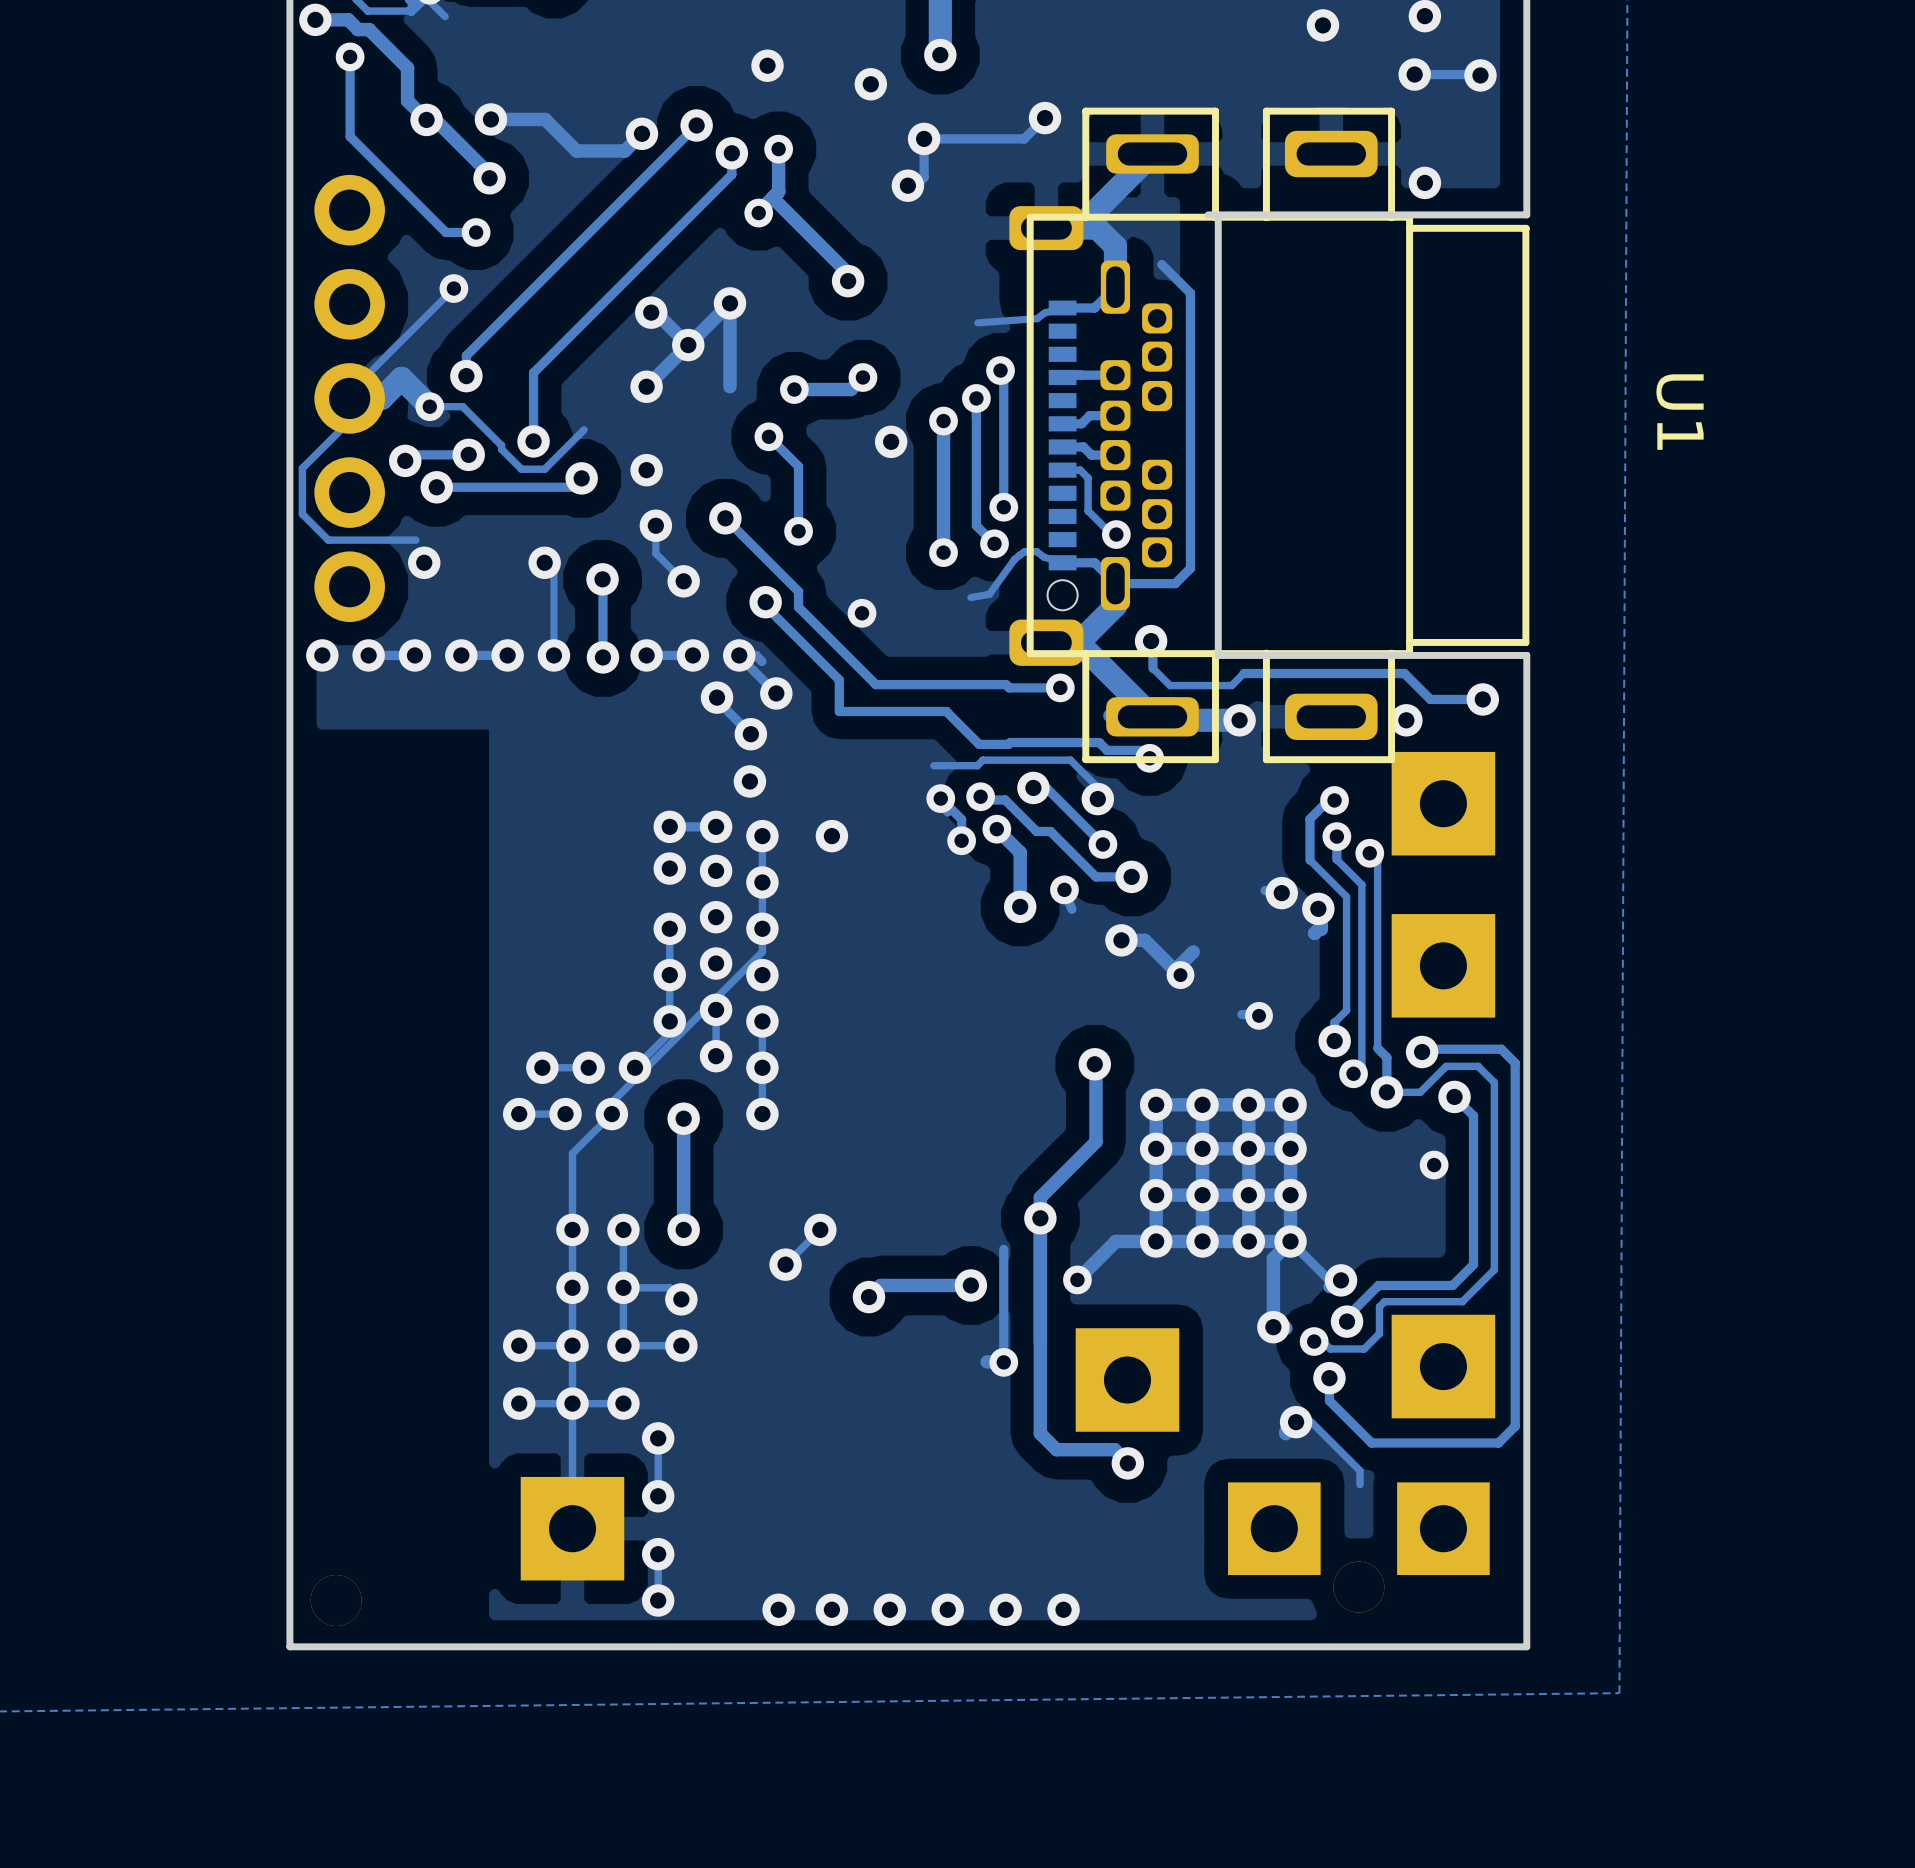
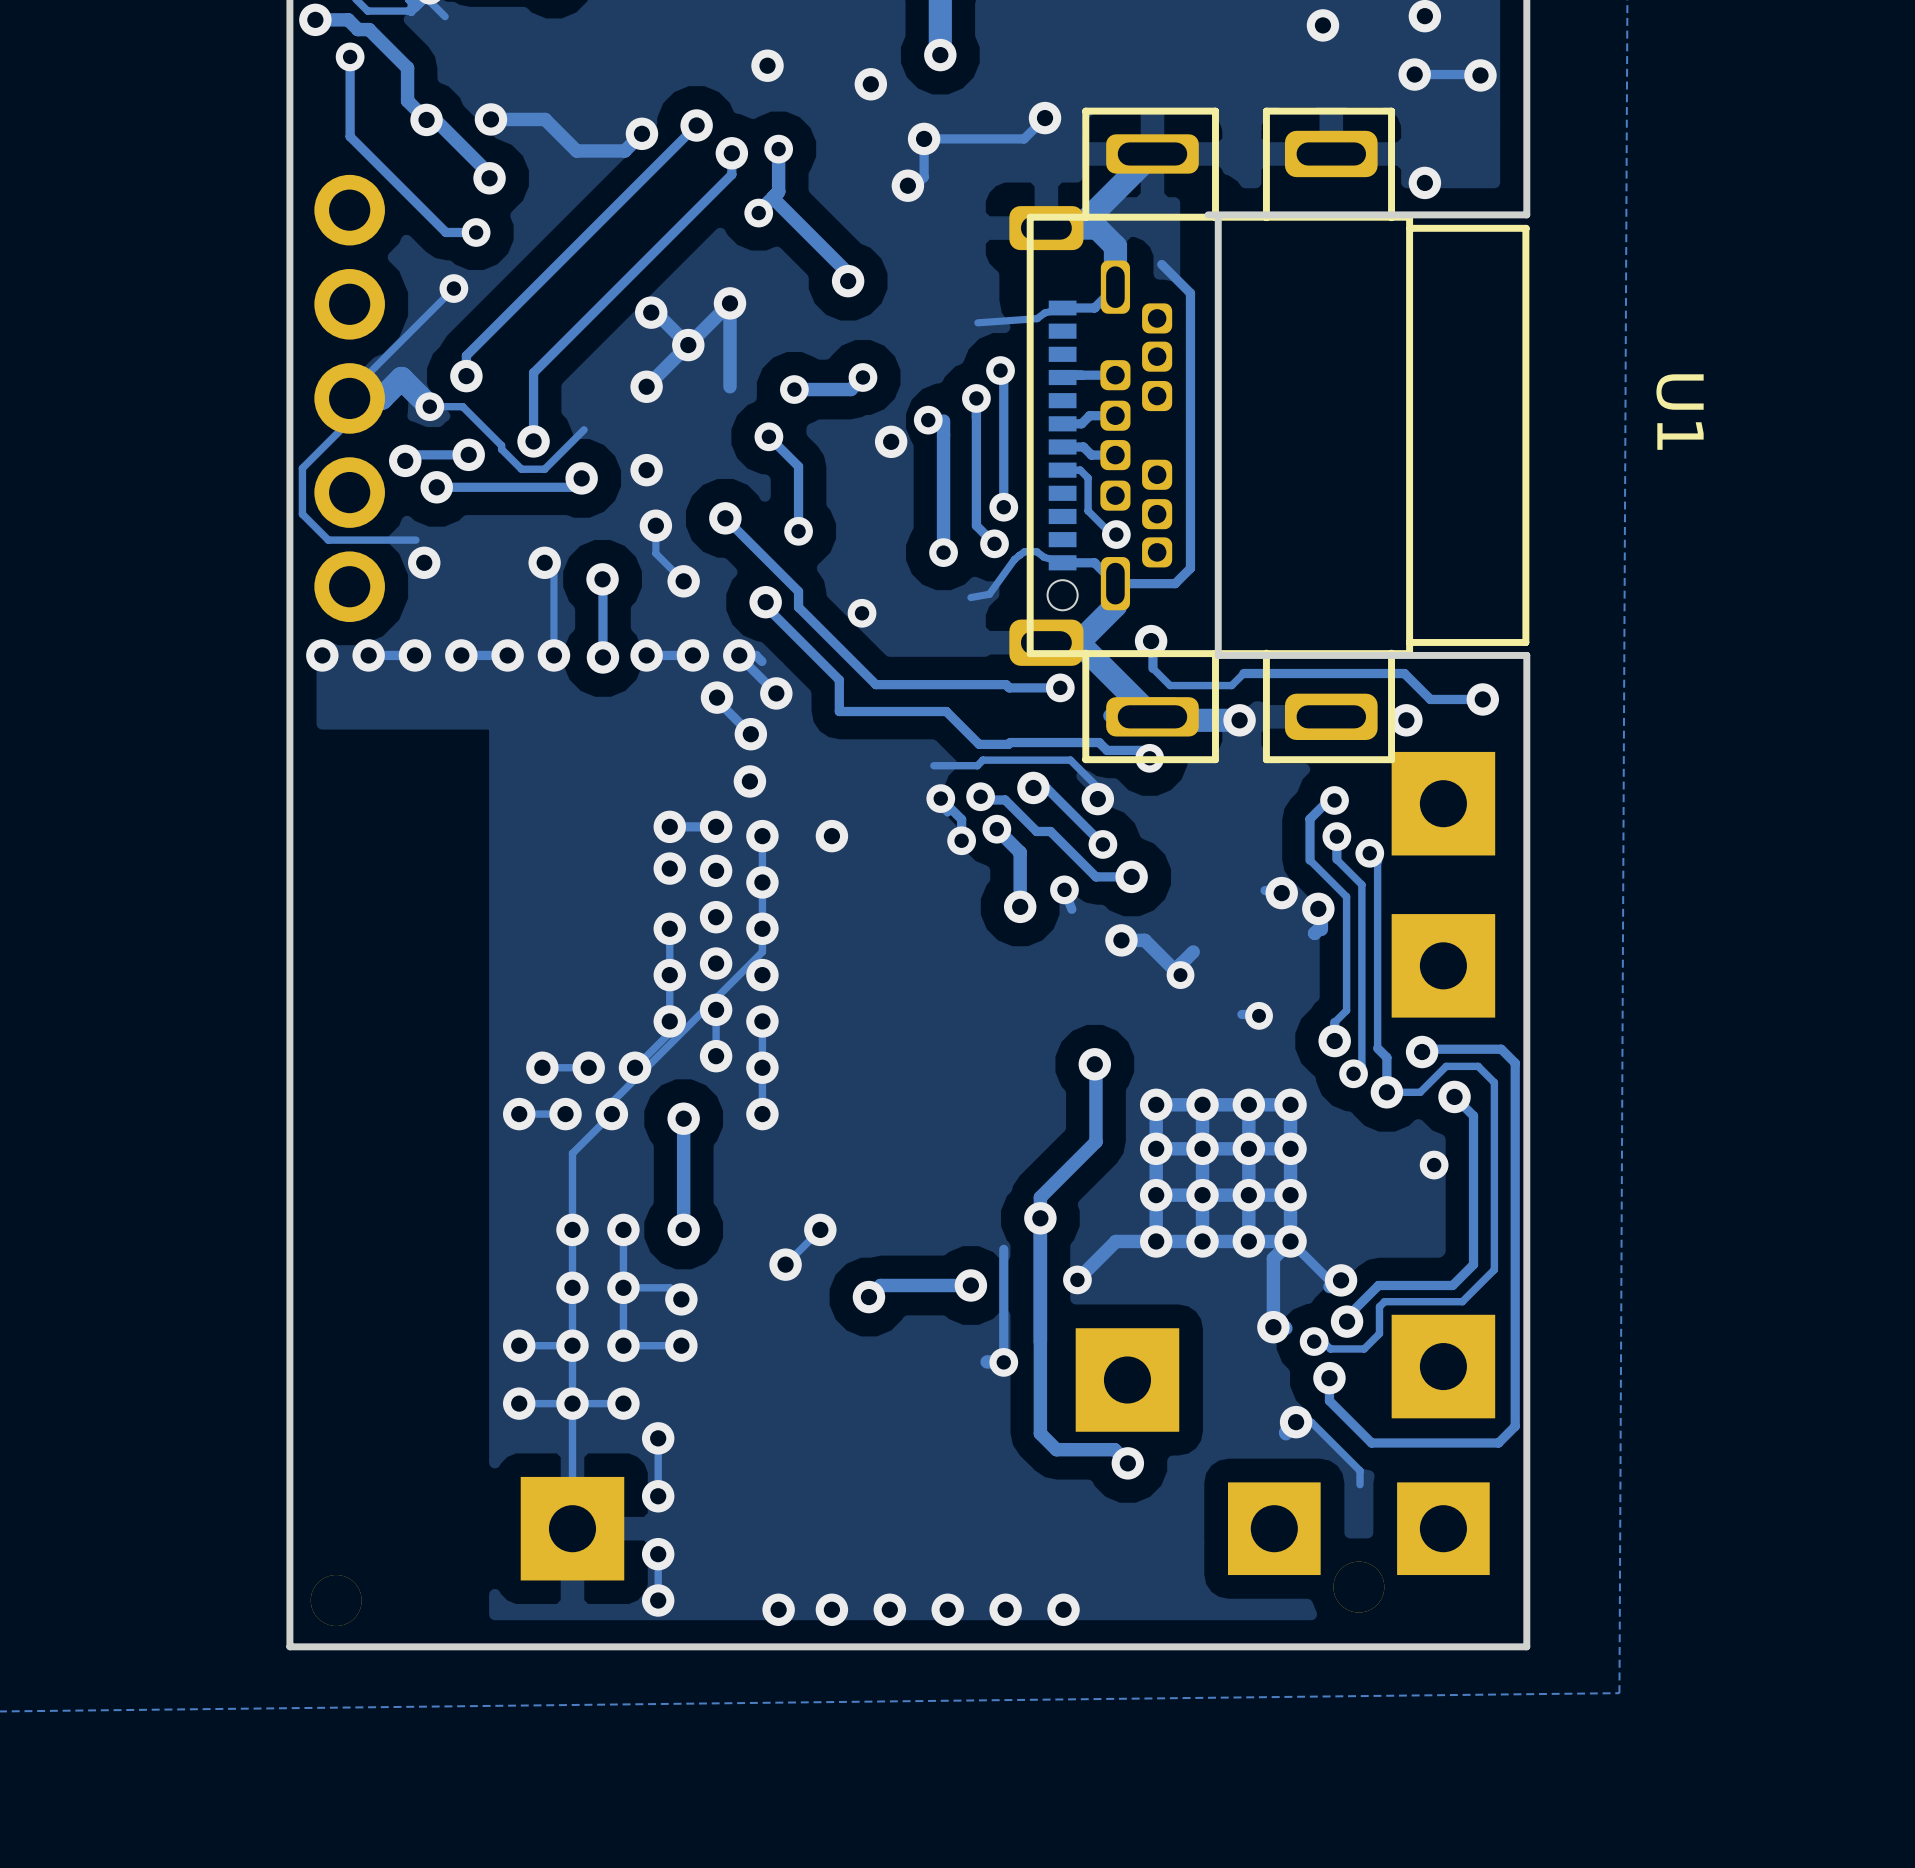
via position: (943, 421) -> (928, 420)

